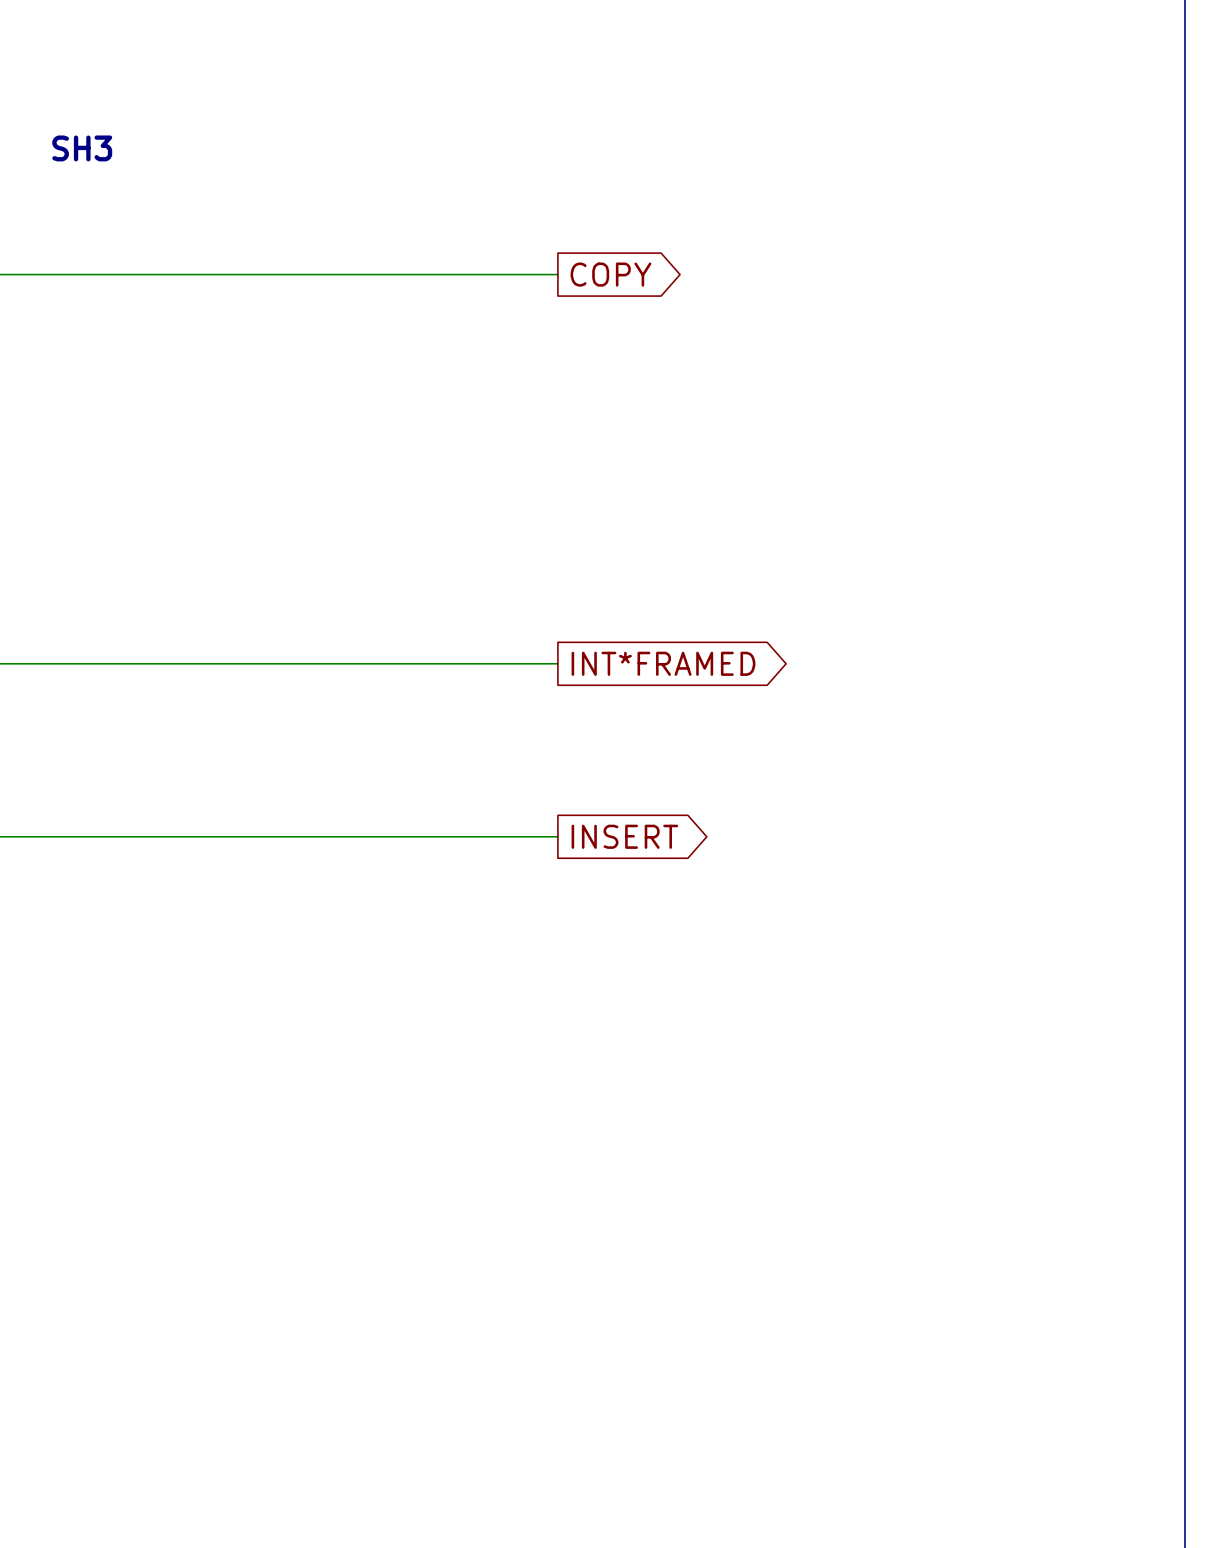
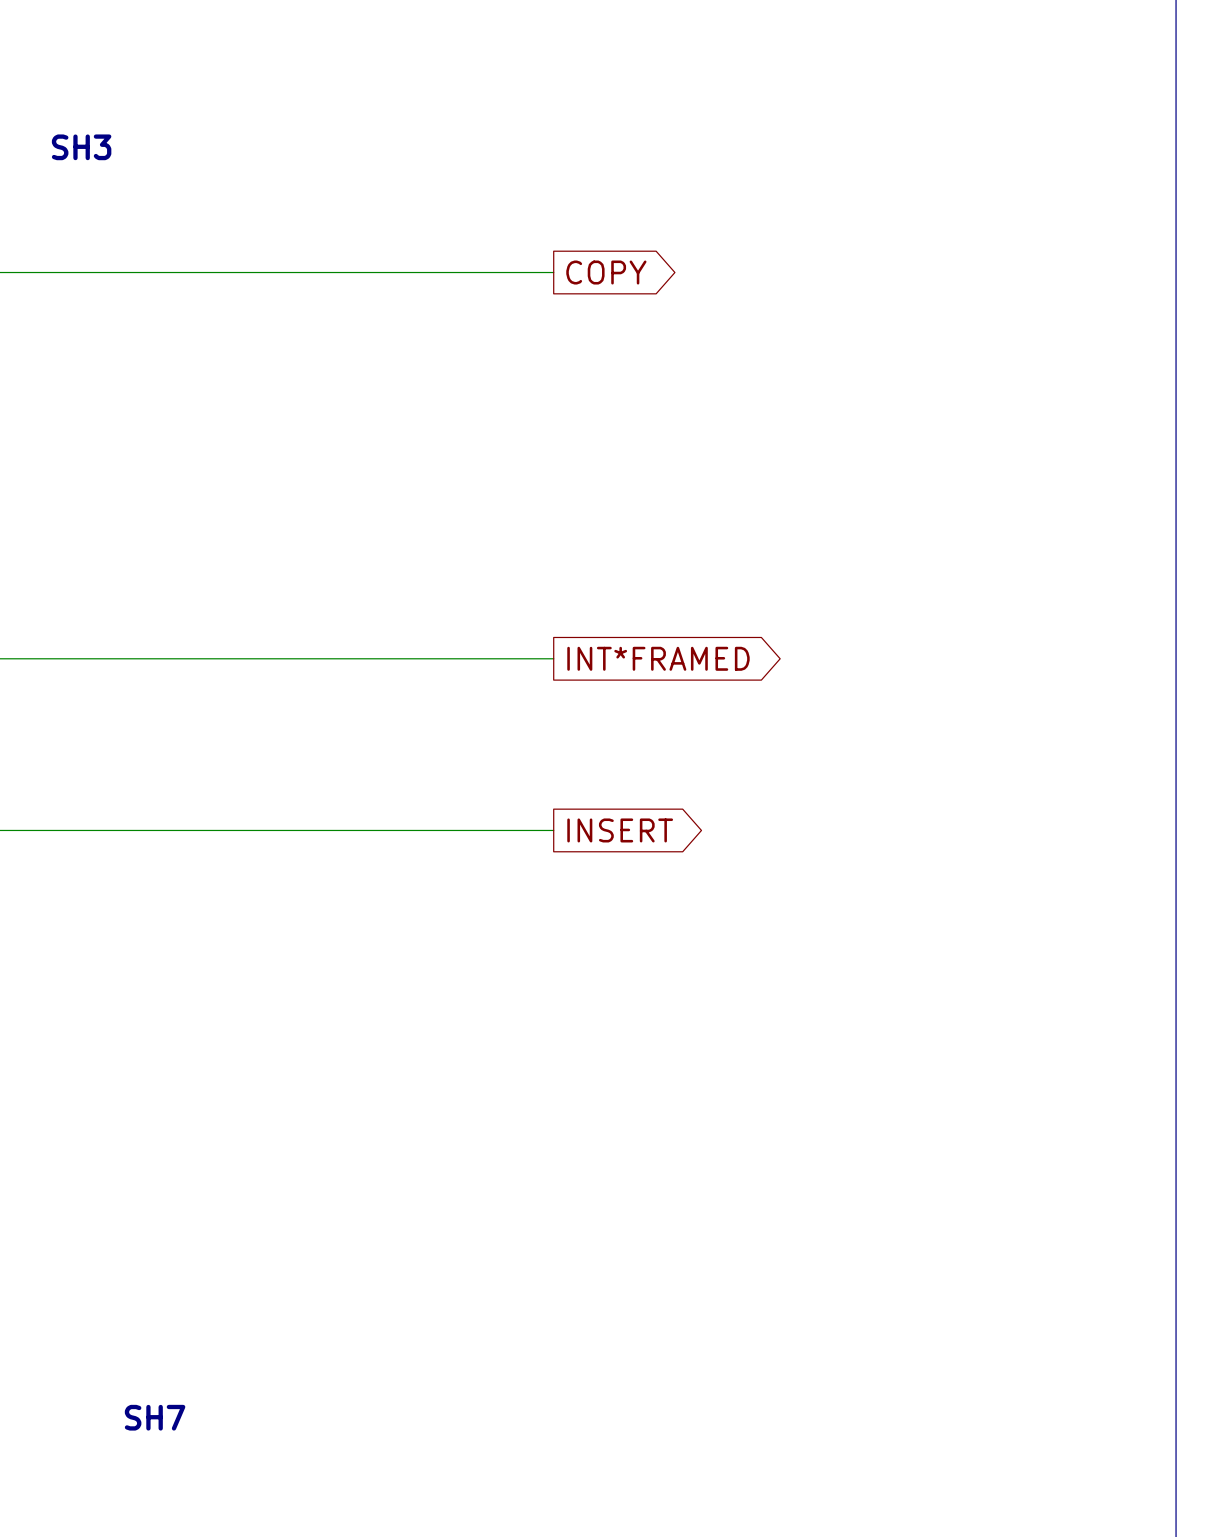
text: none -> SH7 (155, 1417)

